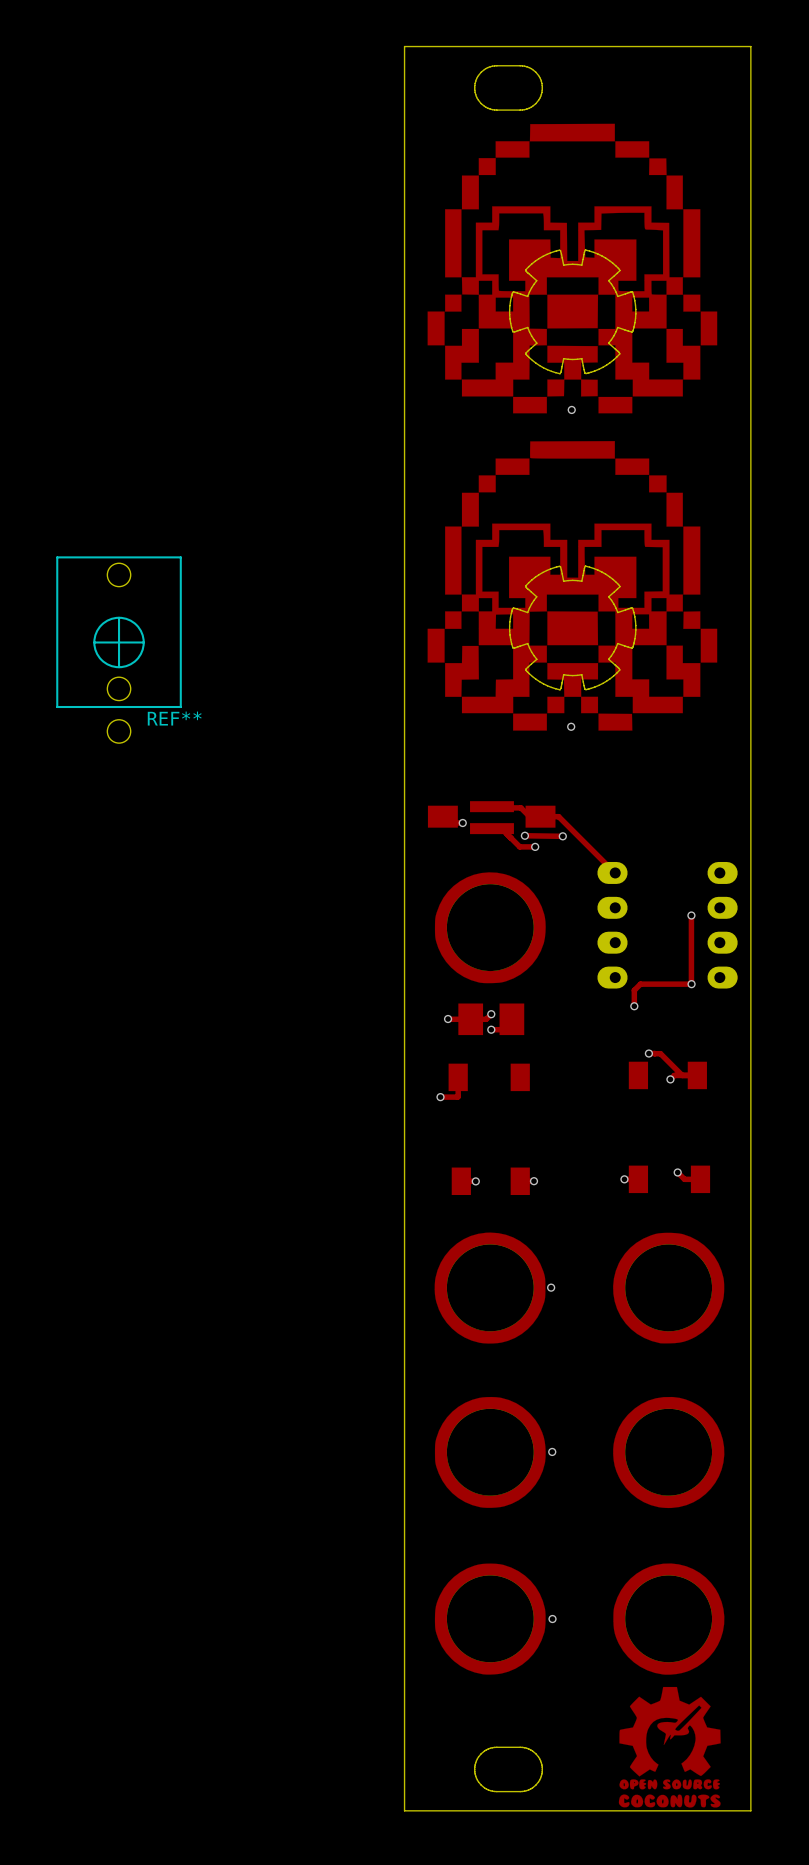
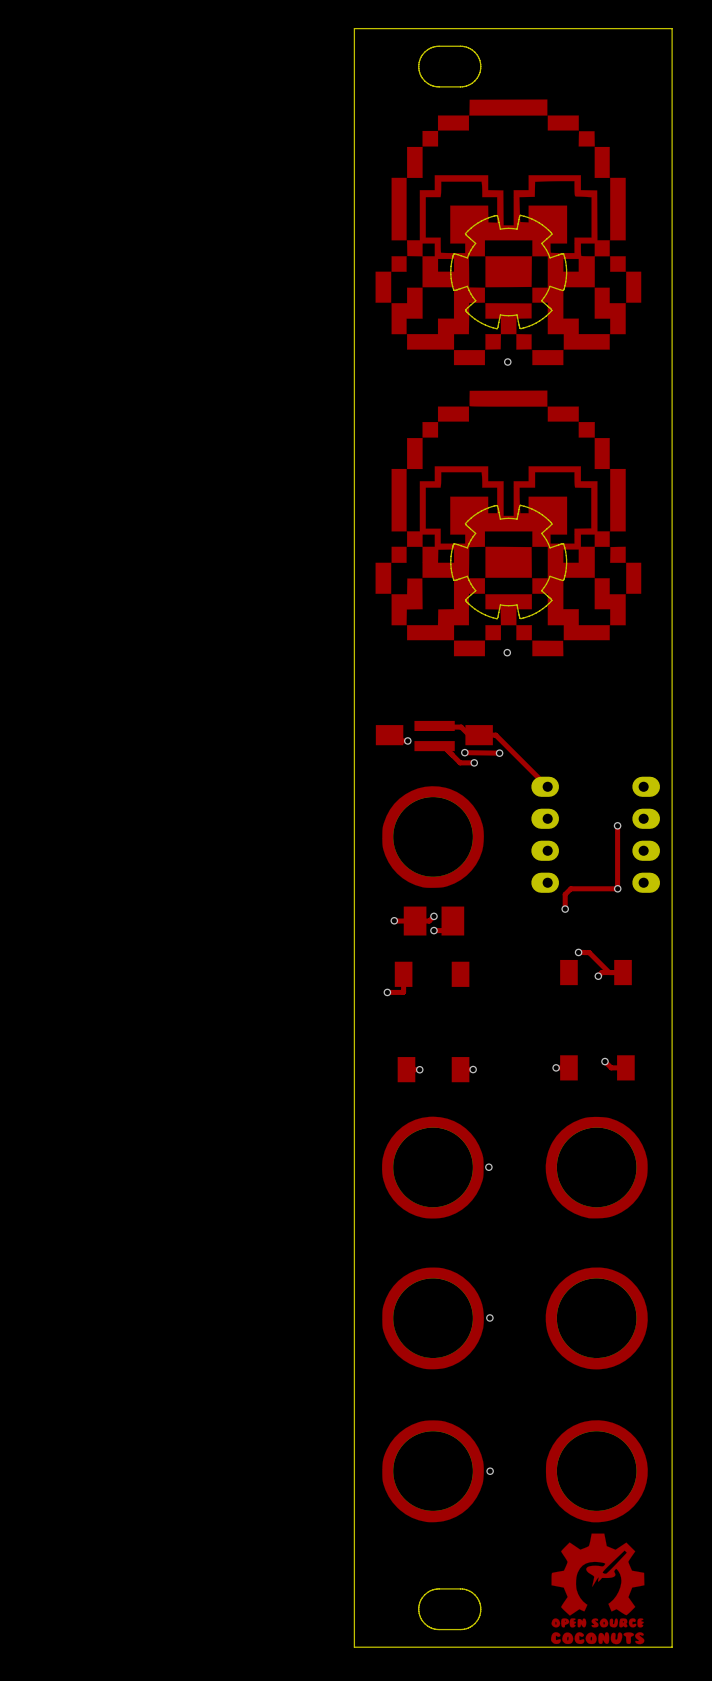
REF**: (119, 650) -> none

